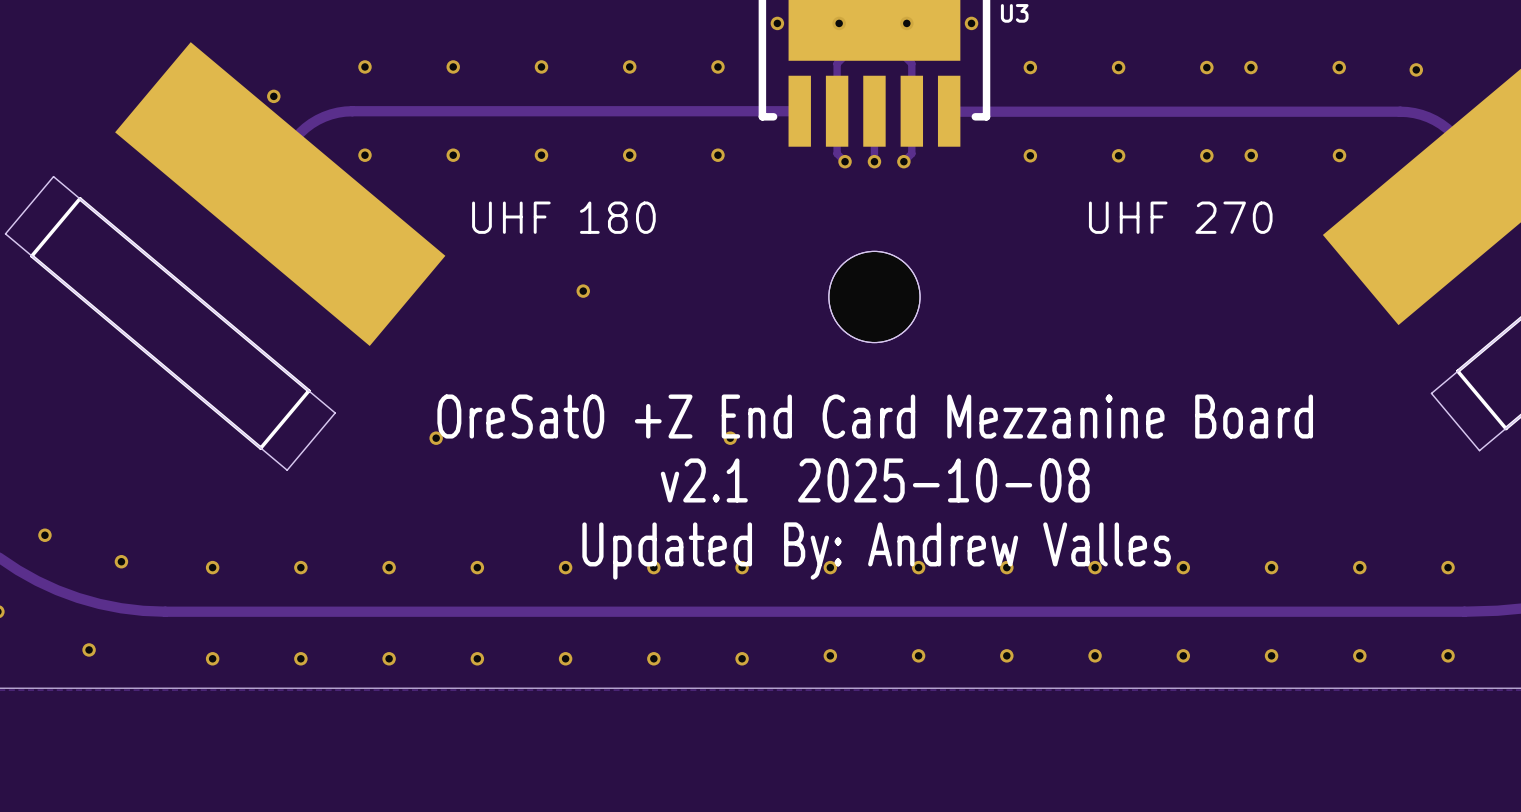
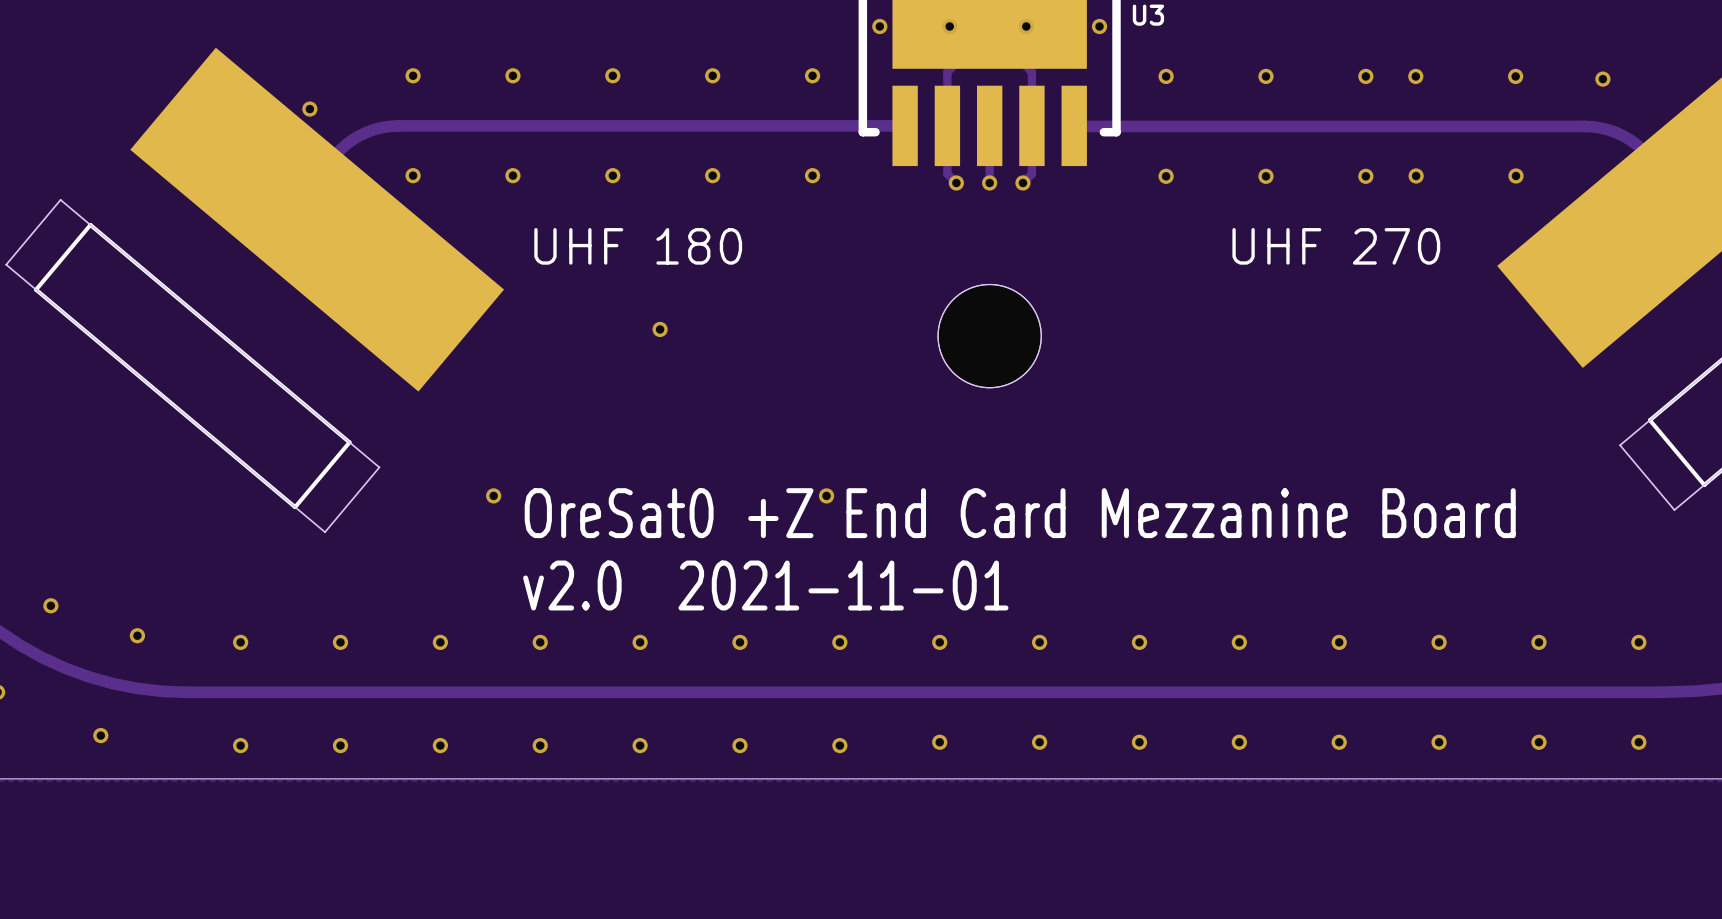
text position: OreSat0 +Z End Card Mezzanine Board (875, 416) -> OreSat0 +Z End Card Mezzanine Board (1020, 513)
text: v2.1 2025-10-08 (875, 480) -> v2.0 2021-11-01 (765, 585)
text: Updated By: Andrew Valles (876, 551) -> none

